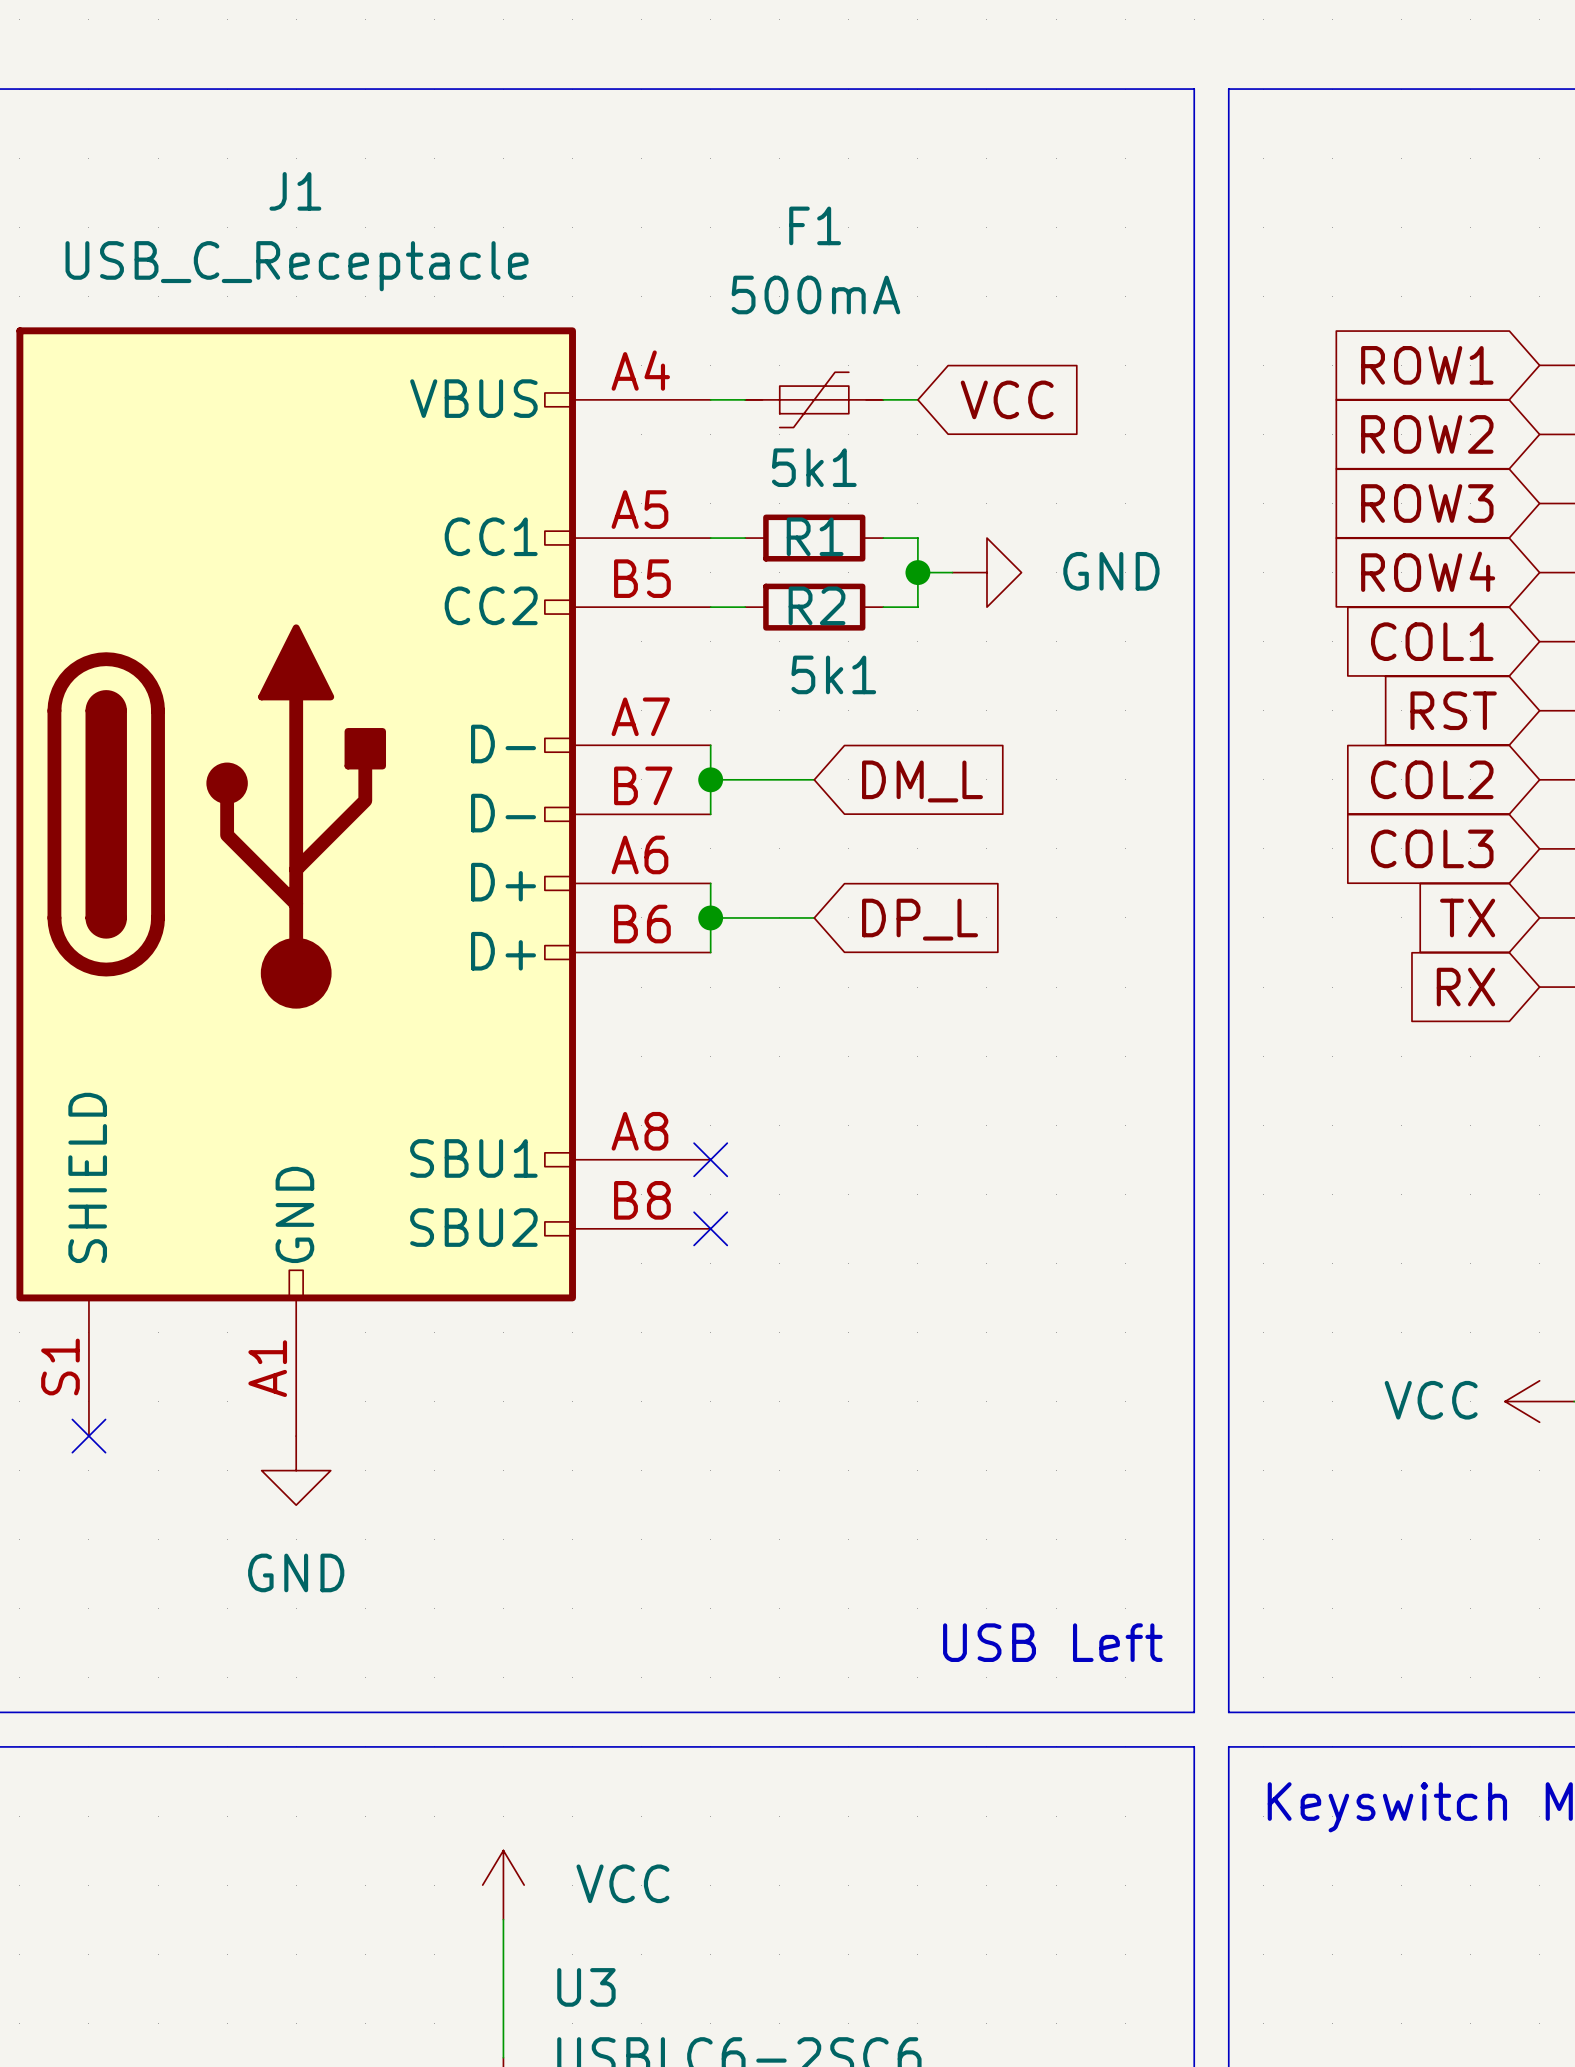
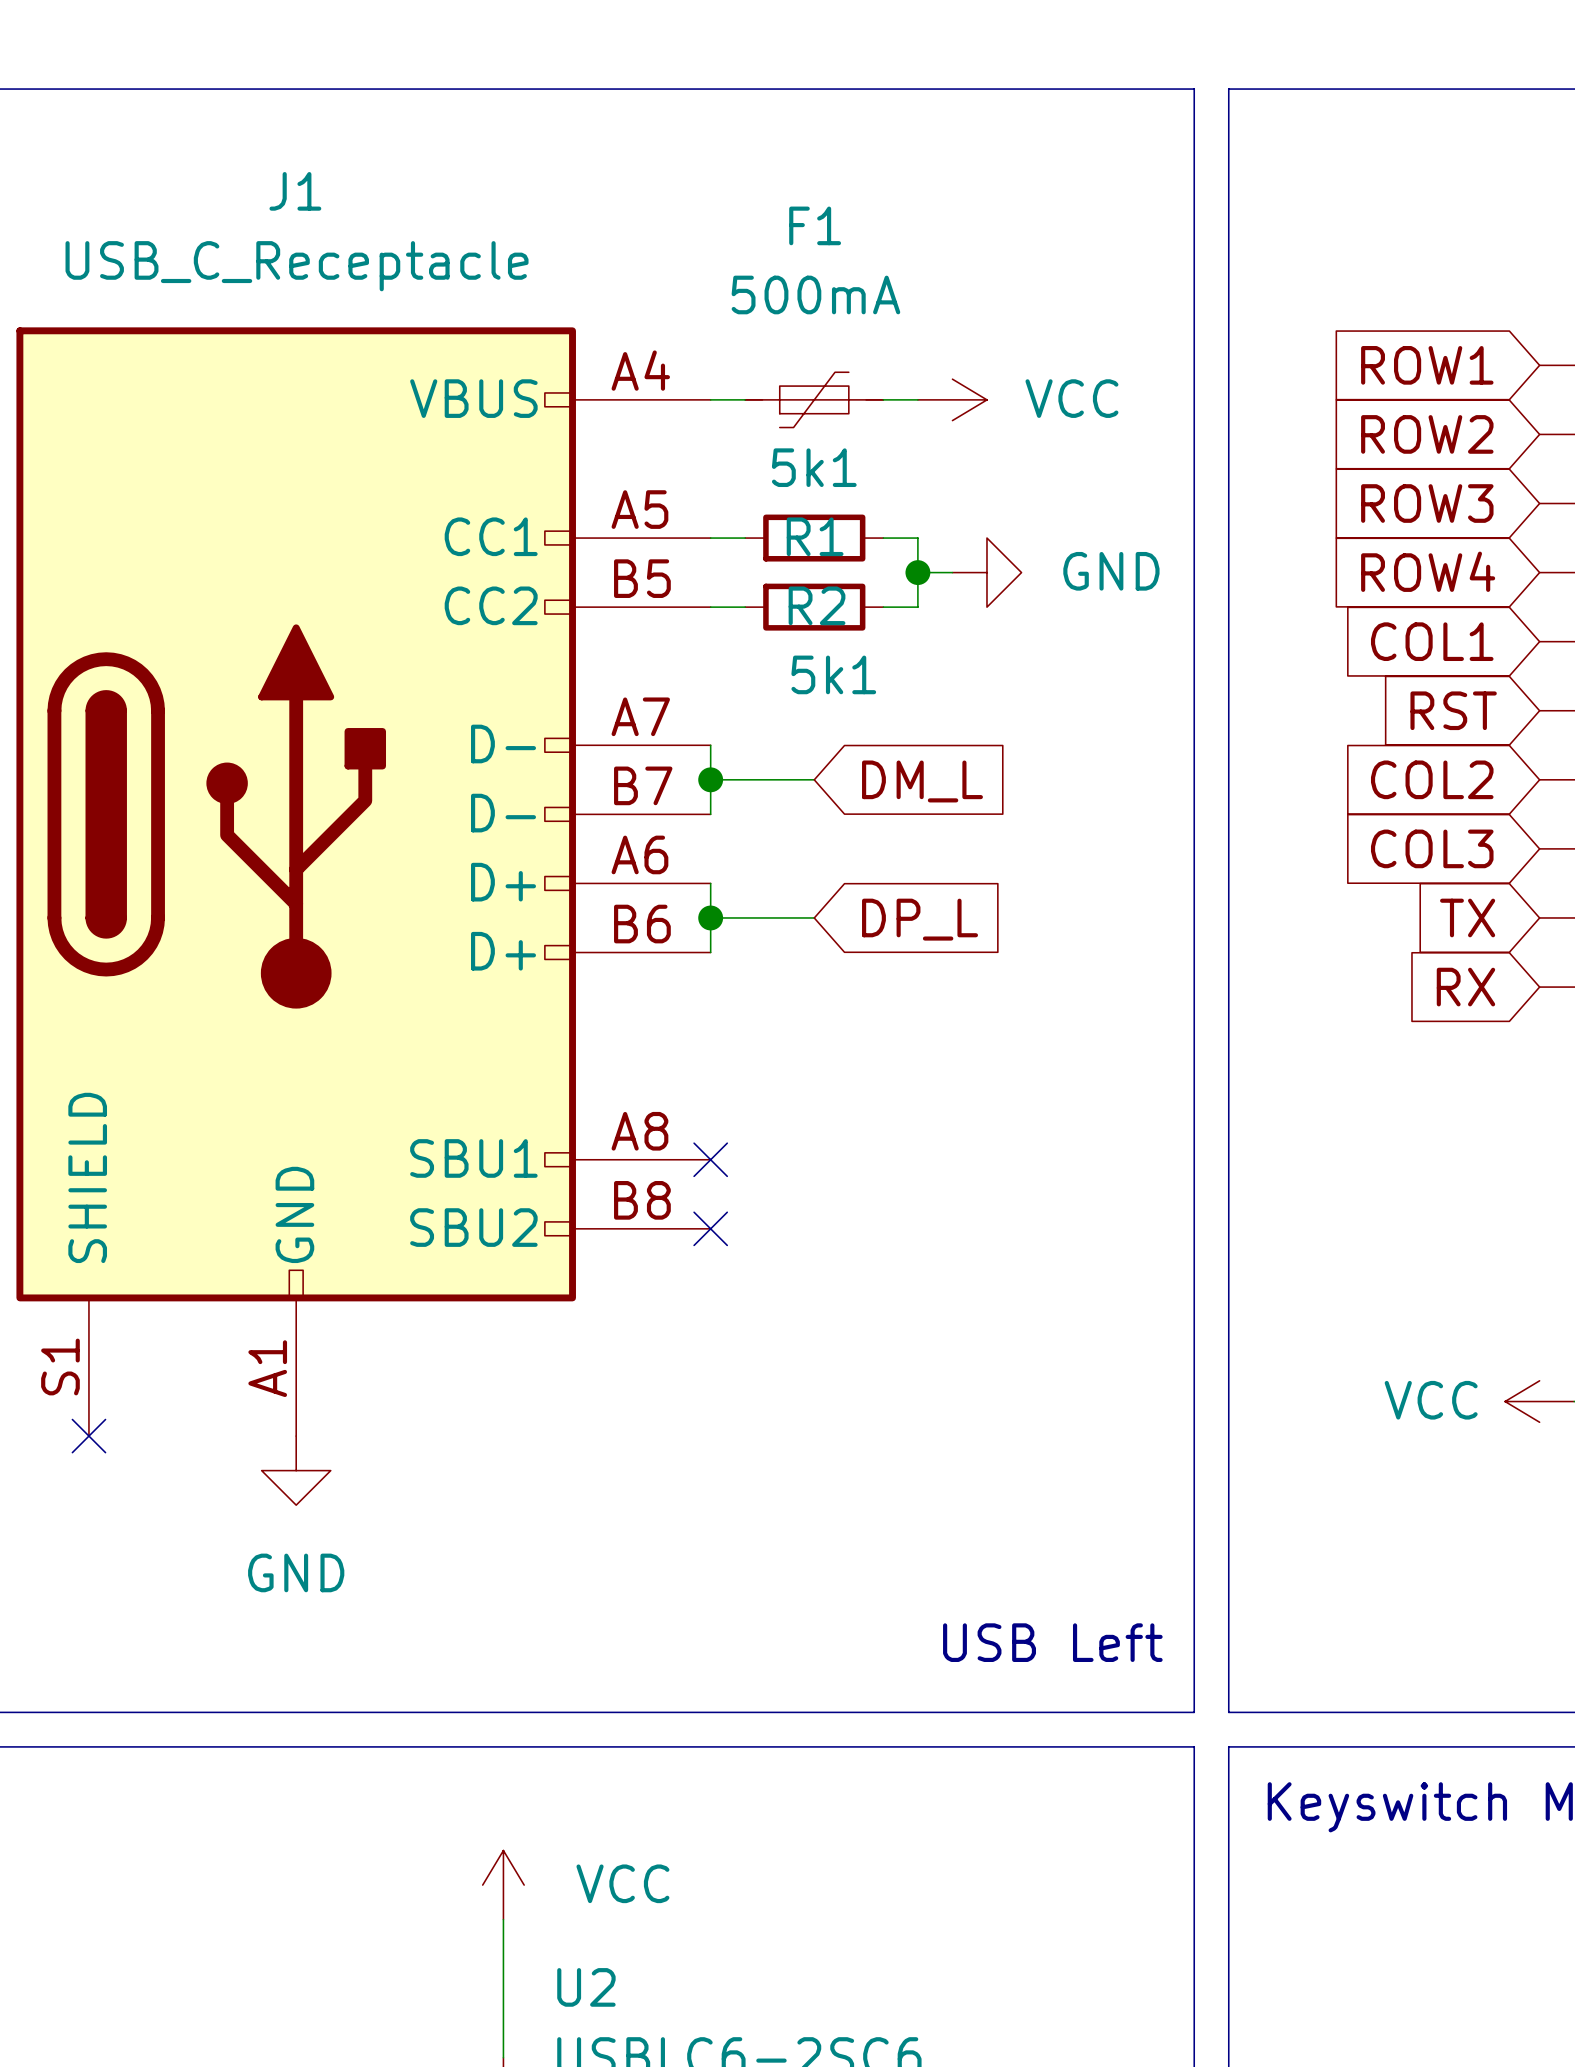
power symbol: none -> VCC (952, 399)
global label: VCC (1007, 399) -> none
U3 name: U3 (586, 1987) -> U2 (586, 1987)

